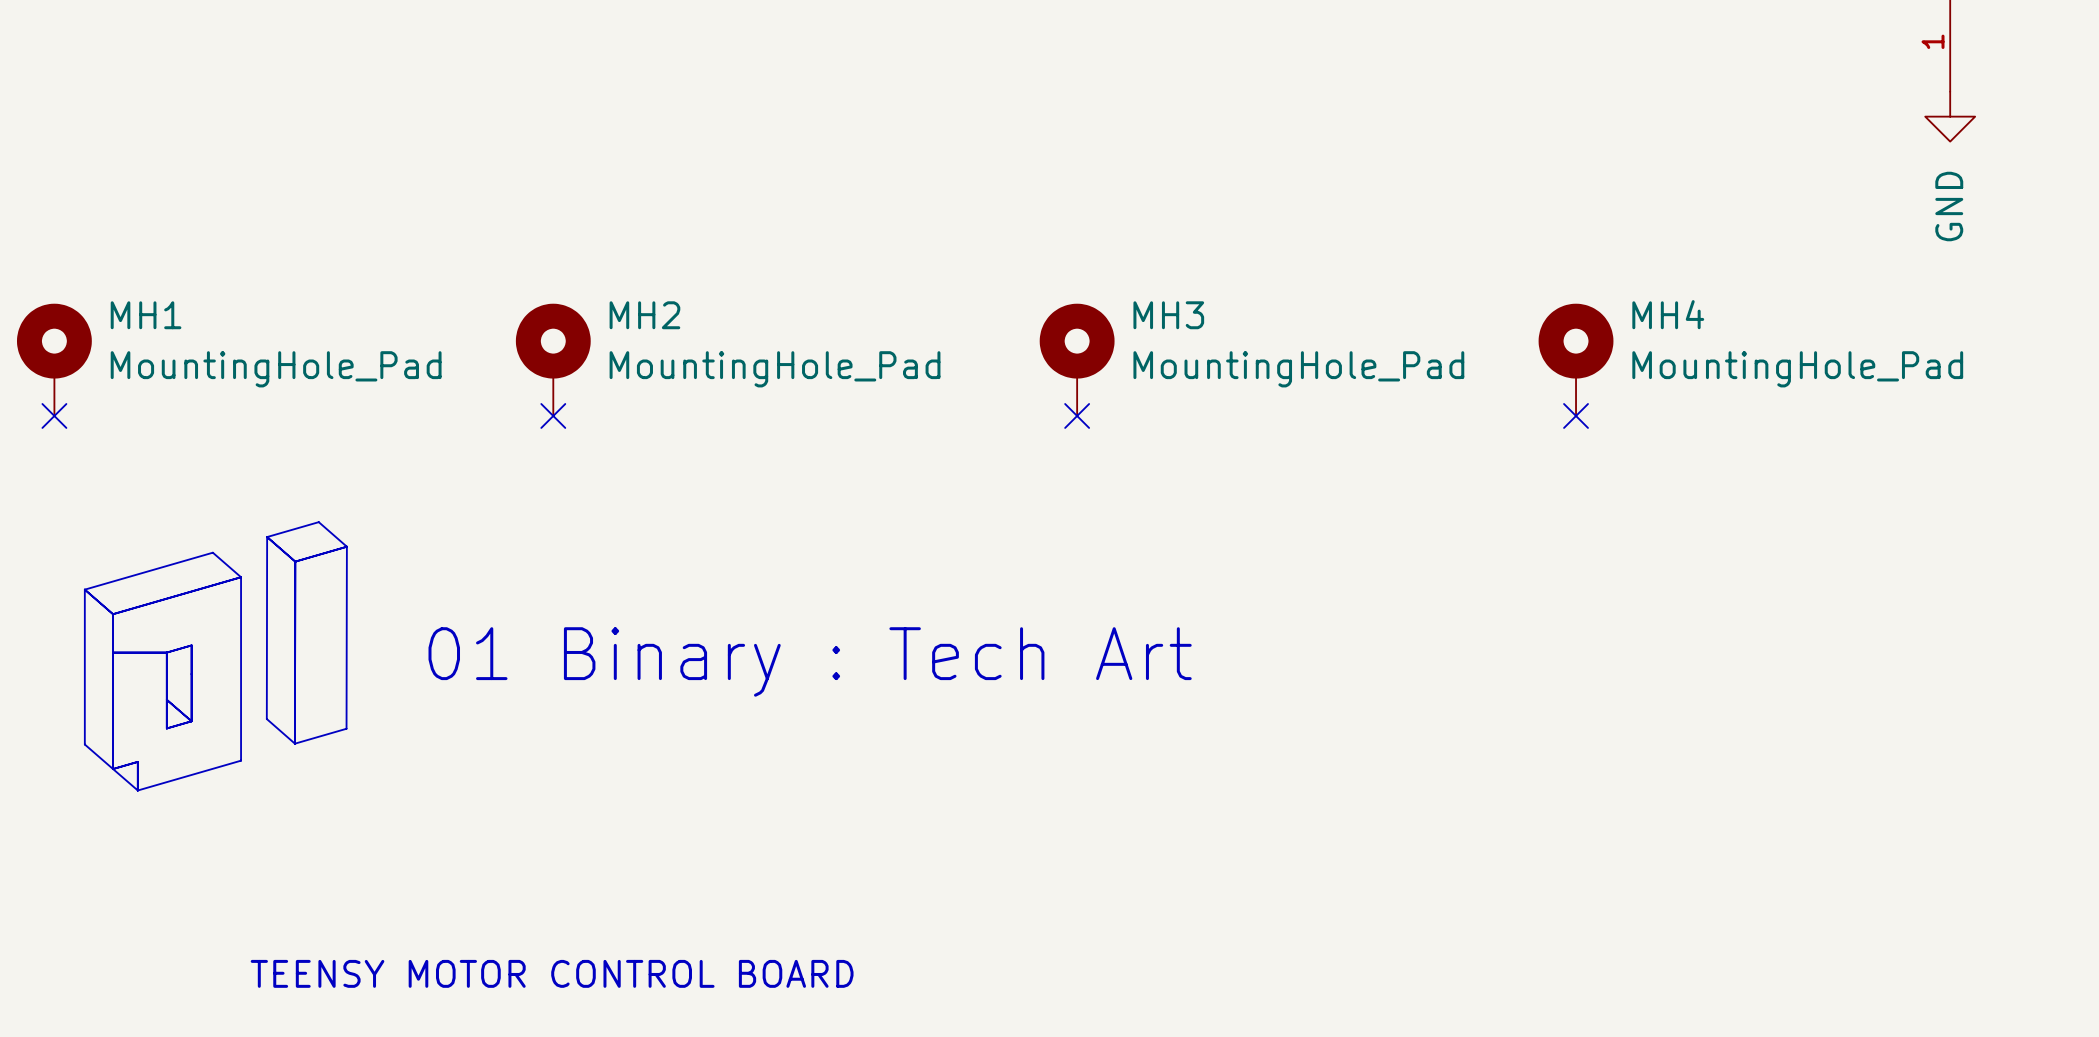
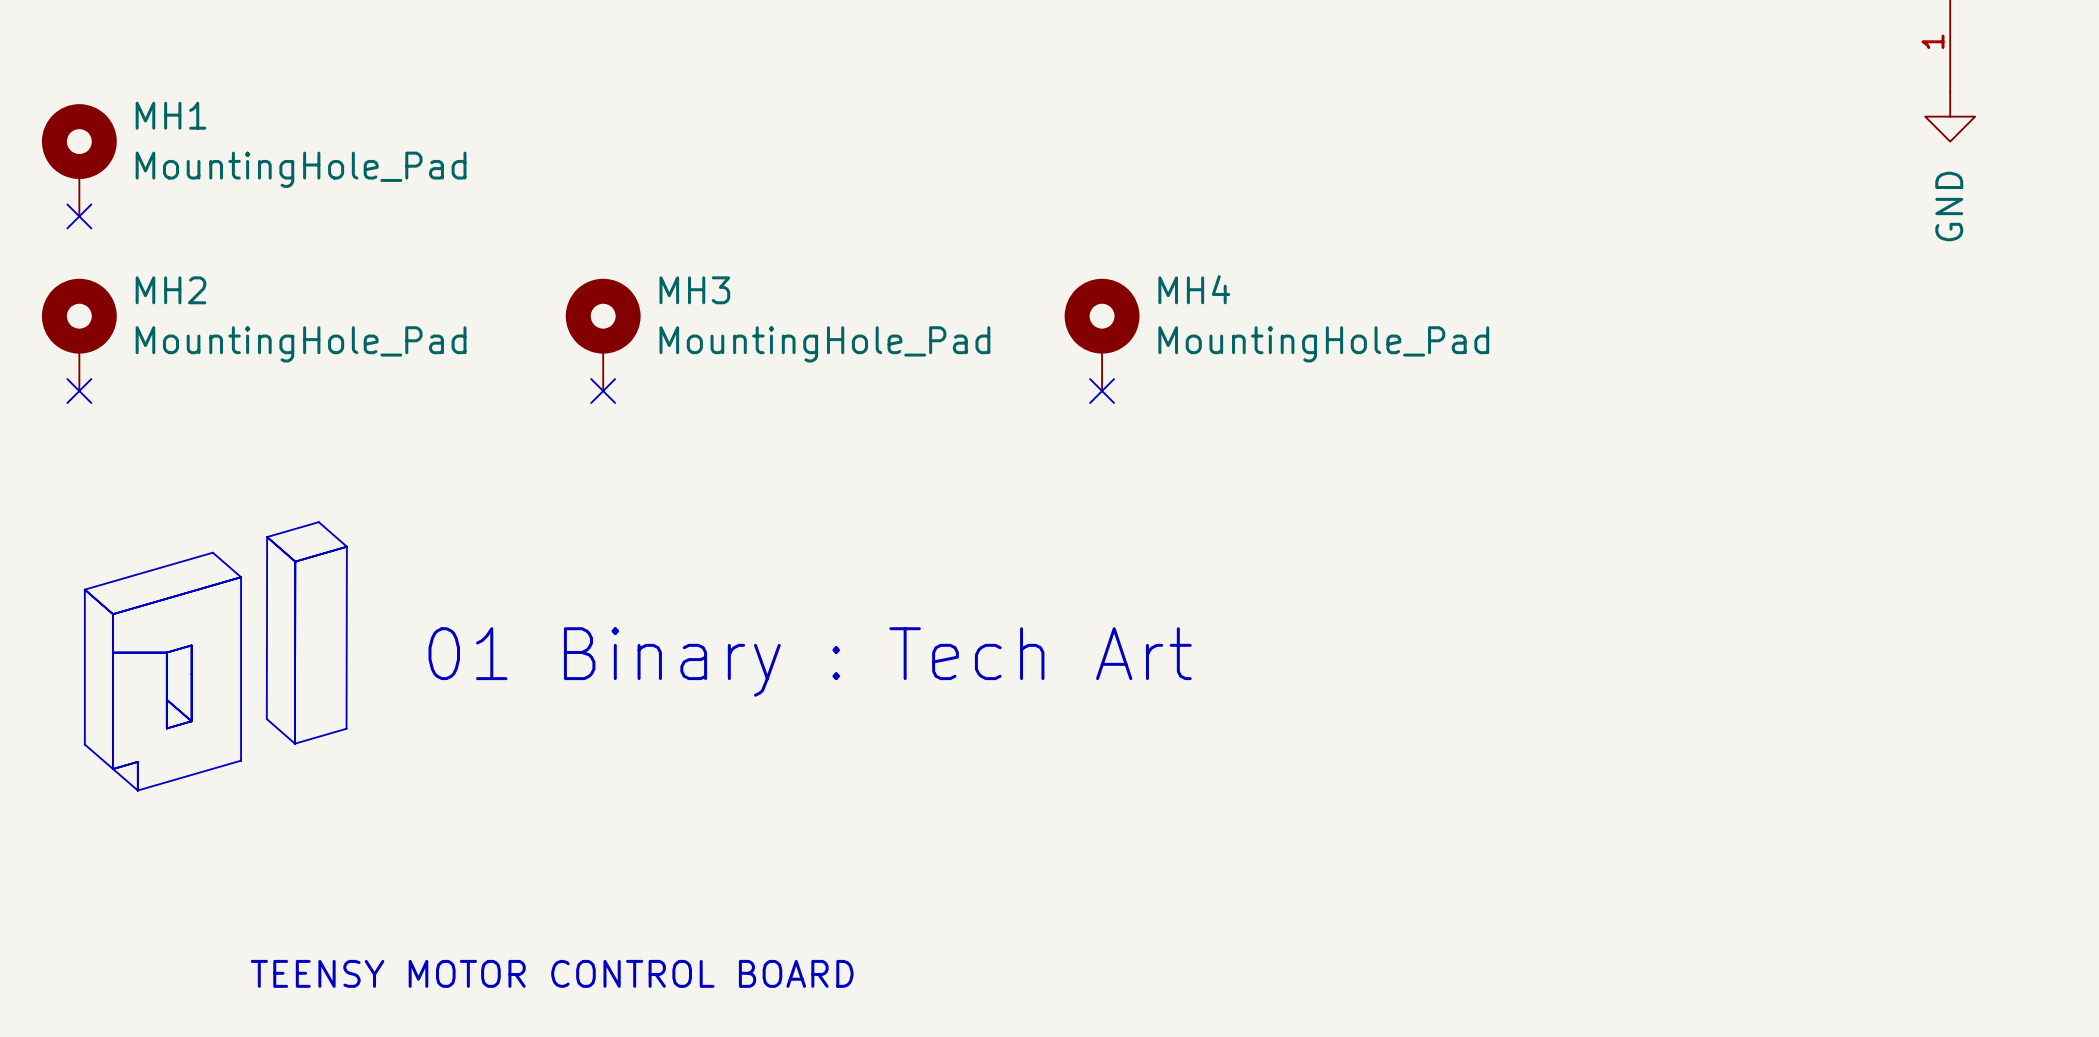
no-connect mark: none -> (79, 216)
MH1 position: (54, 359) -> (79, 160)
MH2 position: (553, 359) -> (79, 334)
MH3 position: (1077, 359) -> (603, 334)
MH4 position: (1576, 359) -> (1102, 334)
no-connect mark position: (54, 415) -> (79, 391)
no-connect mark position: (553, 415) -> (603, 391)
no-connect mark position: (1077, 415) -> (1102, 391)
no-connect mark: (1576, 415) -> none

